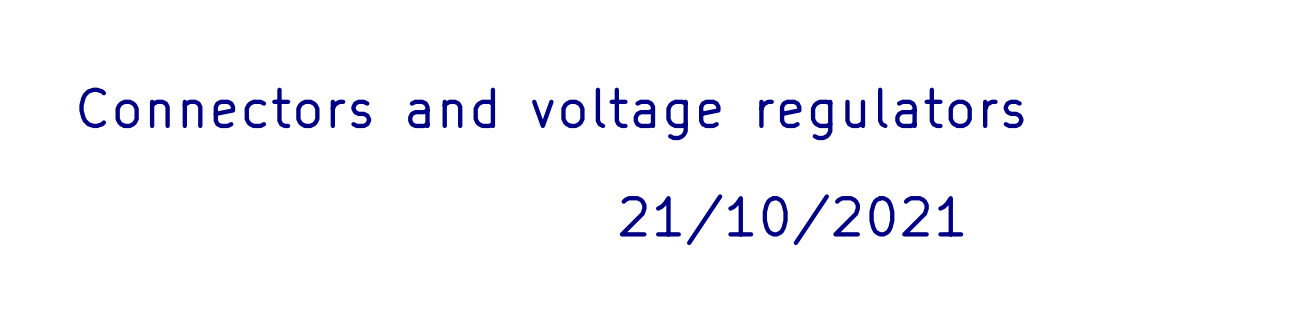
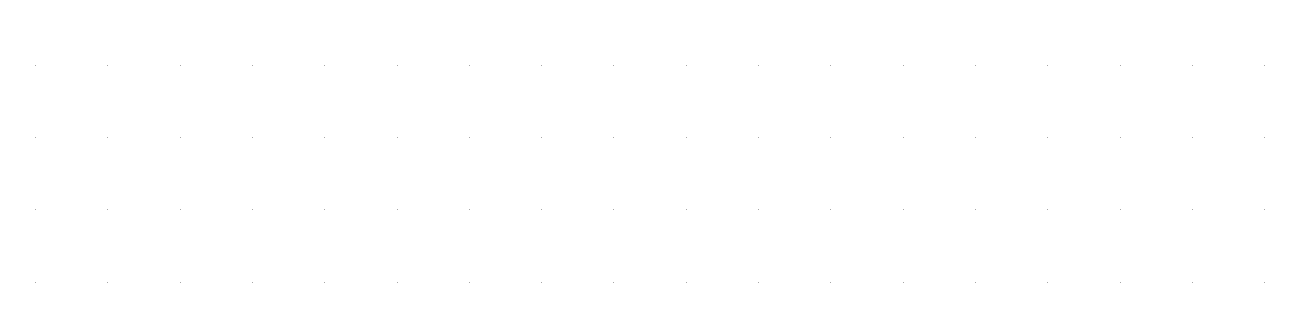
text: Connectors and voltage regulators (551, 113) -> none
text: 21/10/2021 (791, 219) -> none

